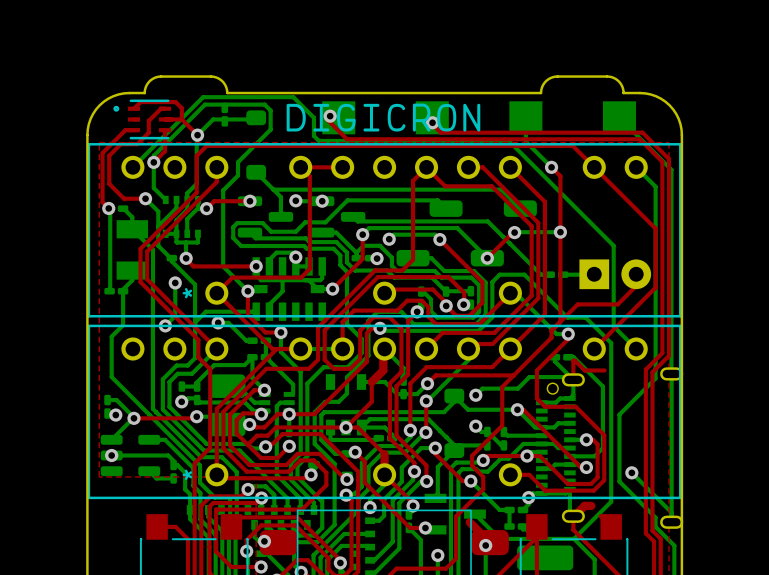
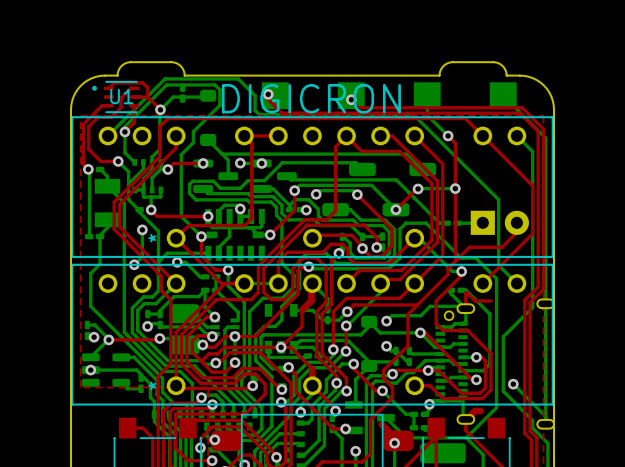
drawing: [286, 103, 481, 132] -> none
U1 name: none -> U1 (121, 96)
text: none -> DIGICRON (311, 98)

